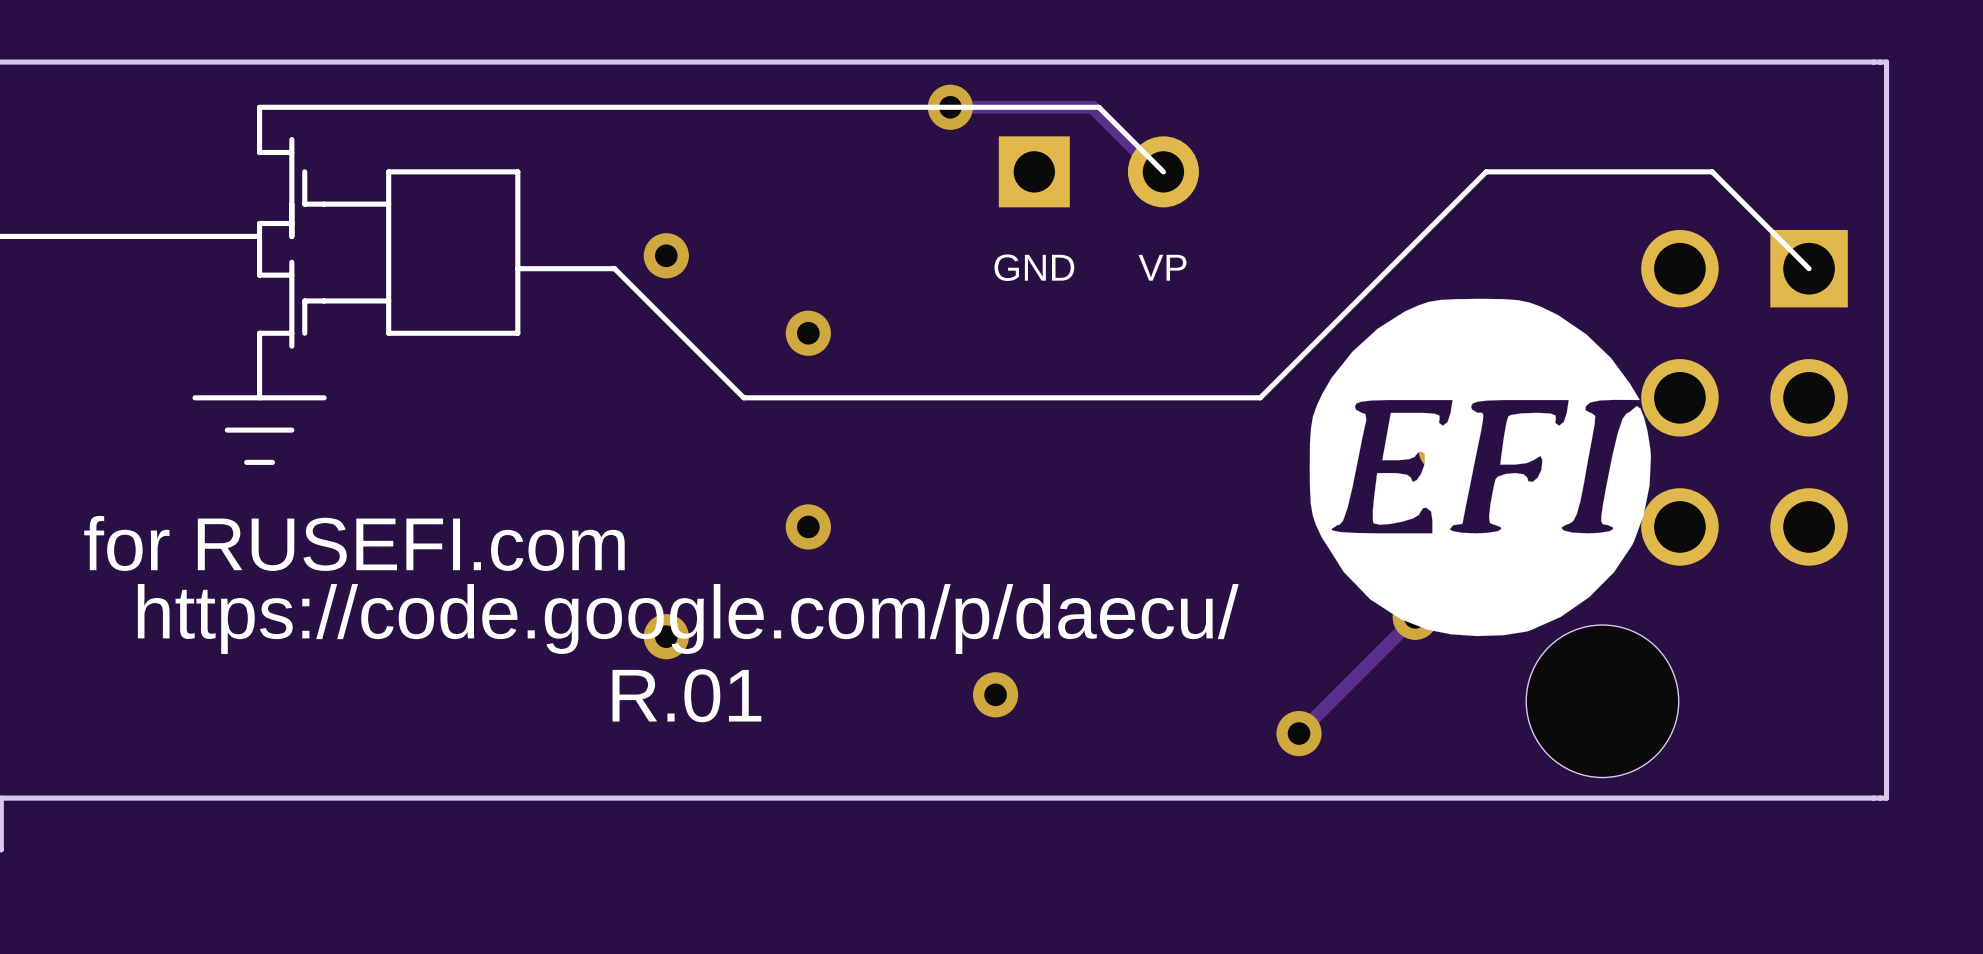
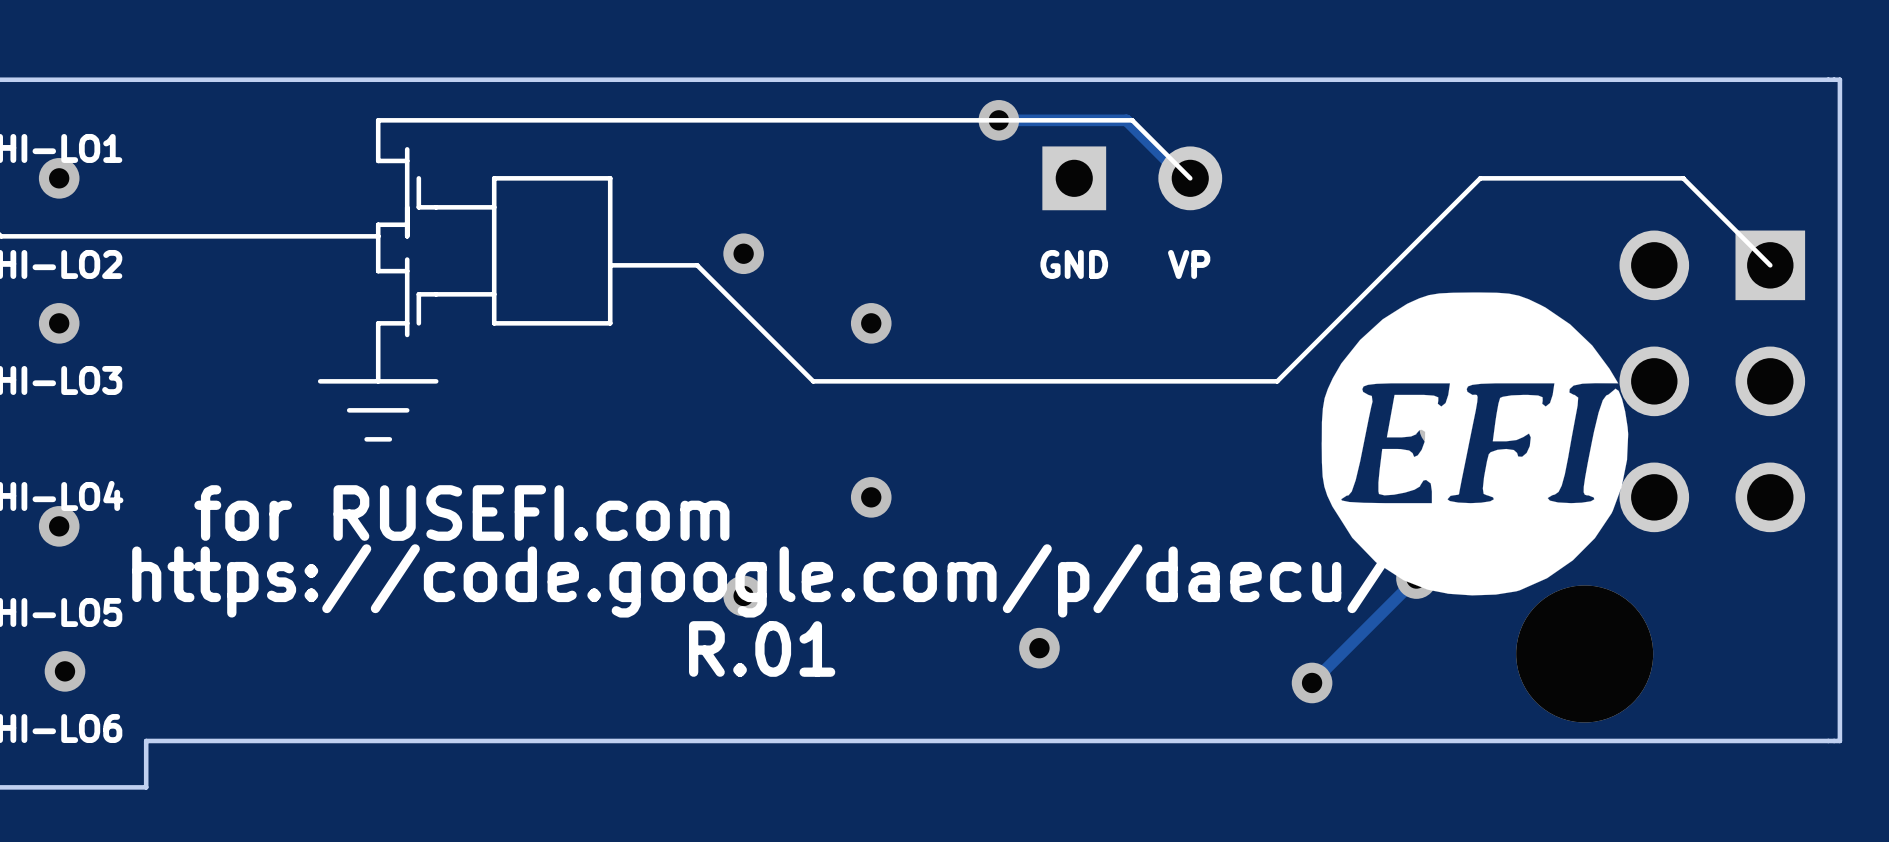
part footprint: [1526, 625, 1679, 778] -> [1516, 585, 1654, 723]

